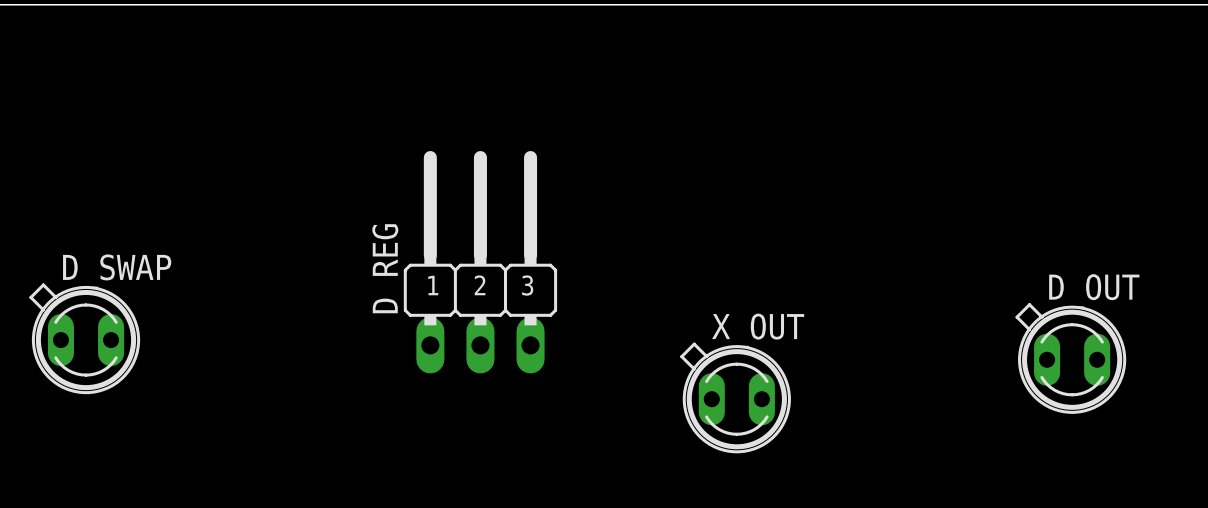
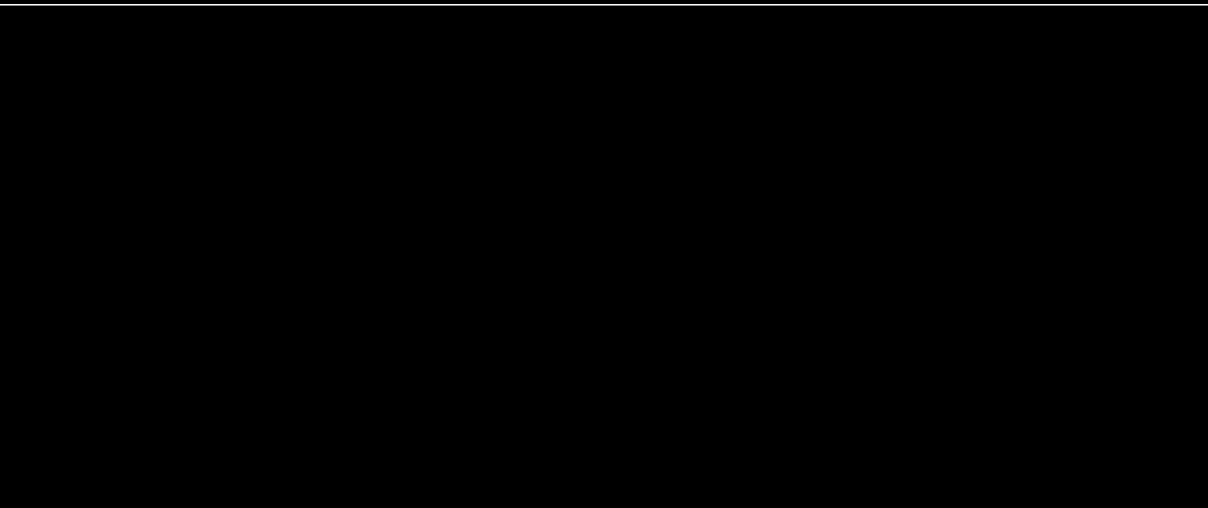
D_REG: (480, 262) -> none
D_SWAP: (84, 338) -> none
D_OUT: (1070, 358) -> none
X_OUT: (735, 397) -> none

